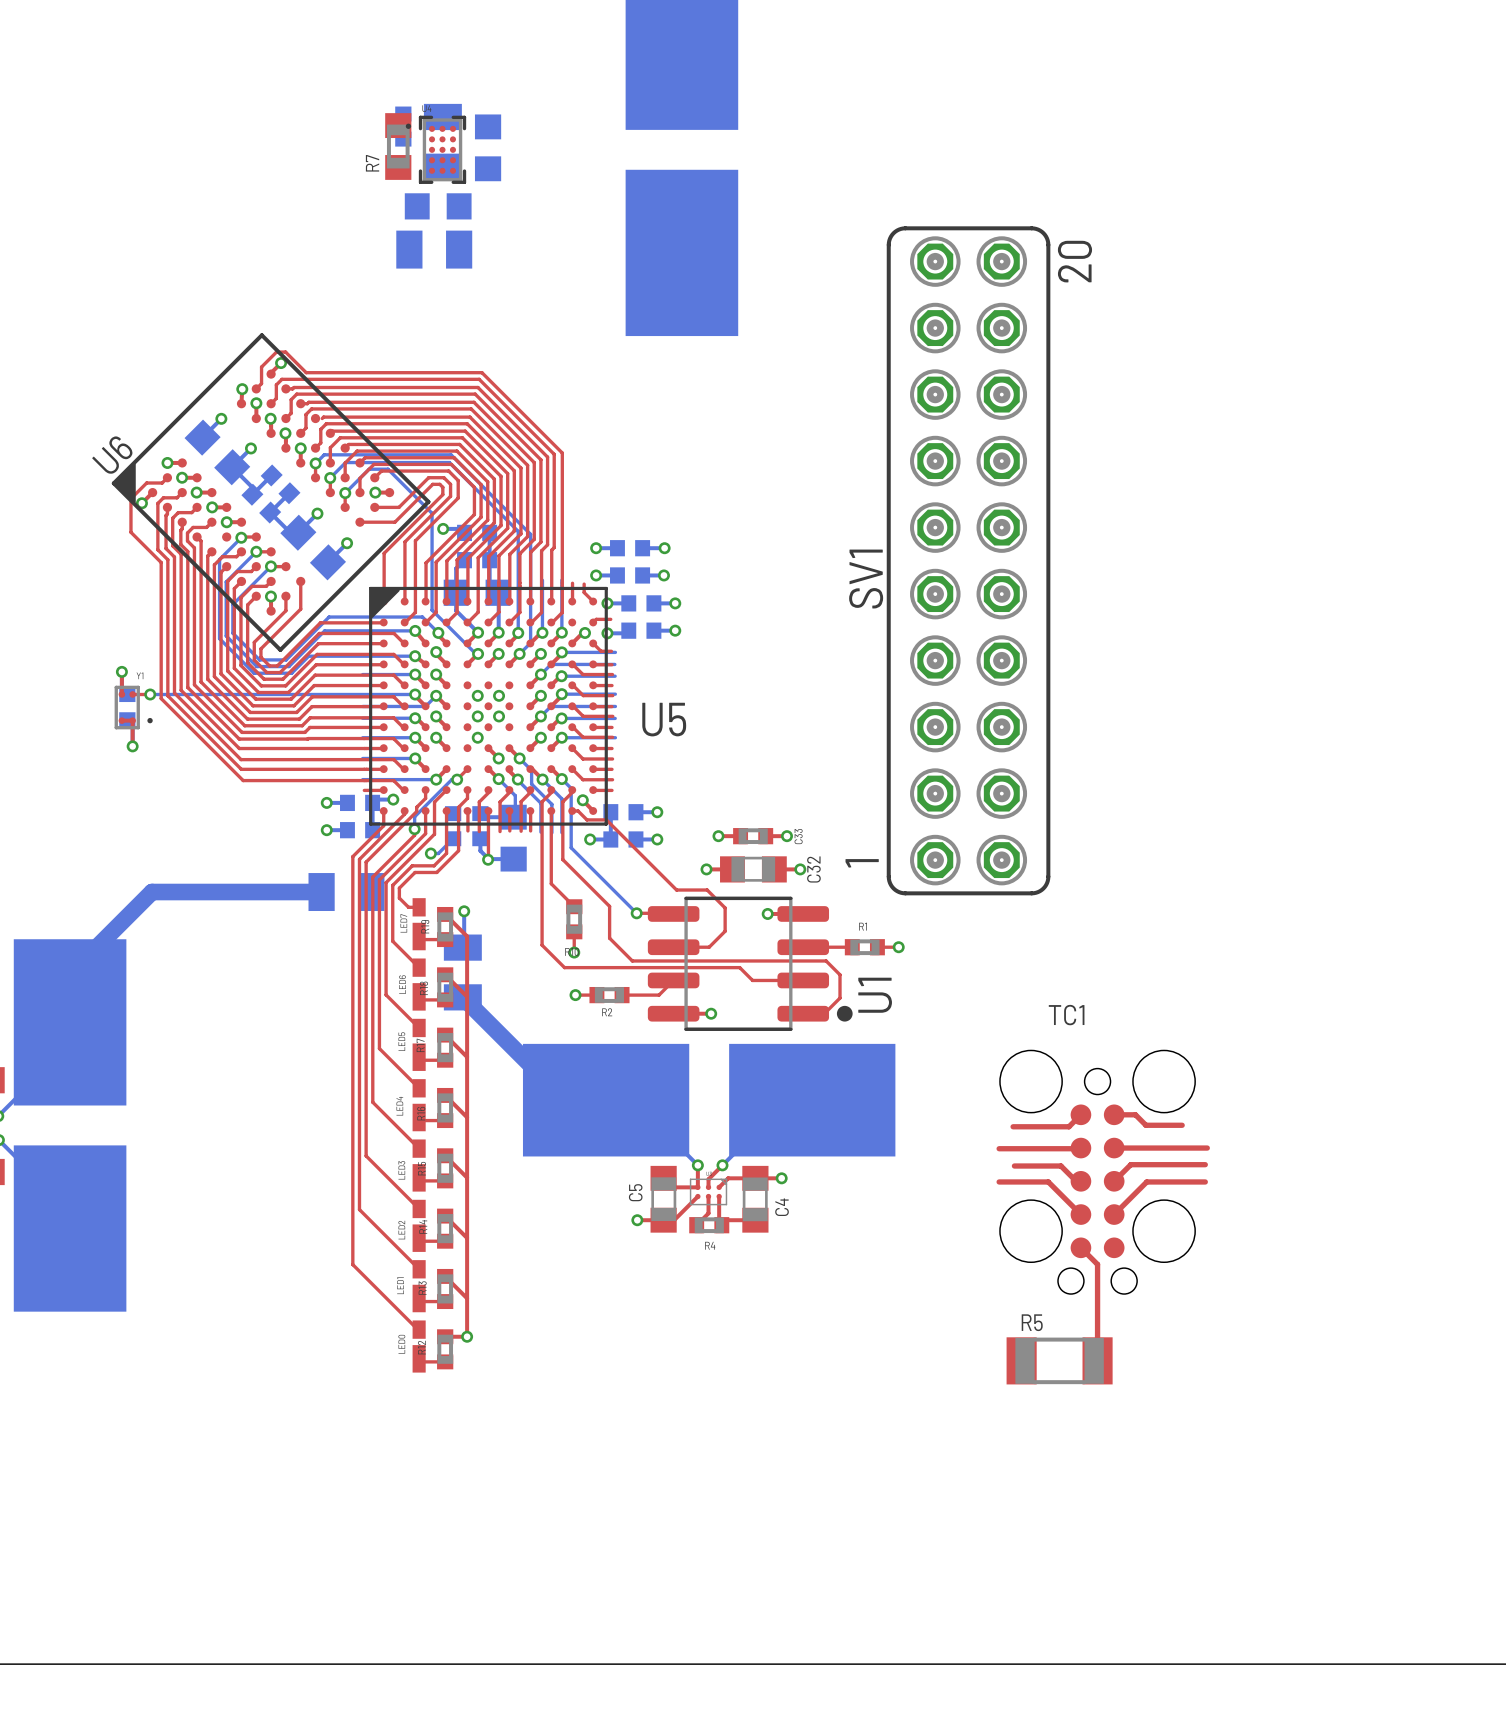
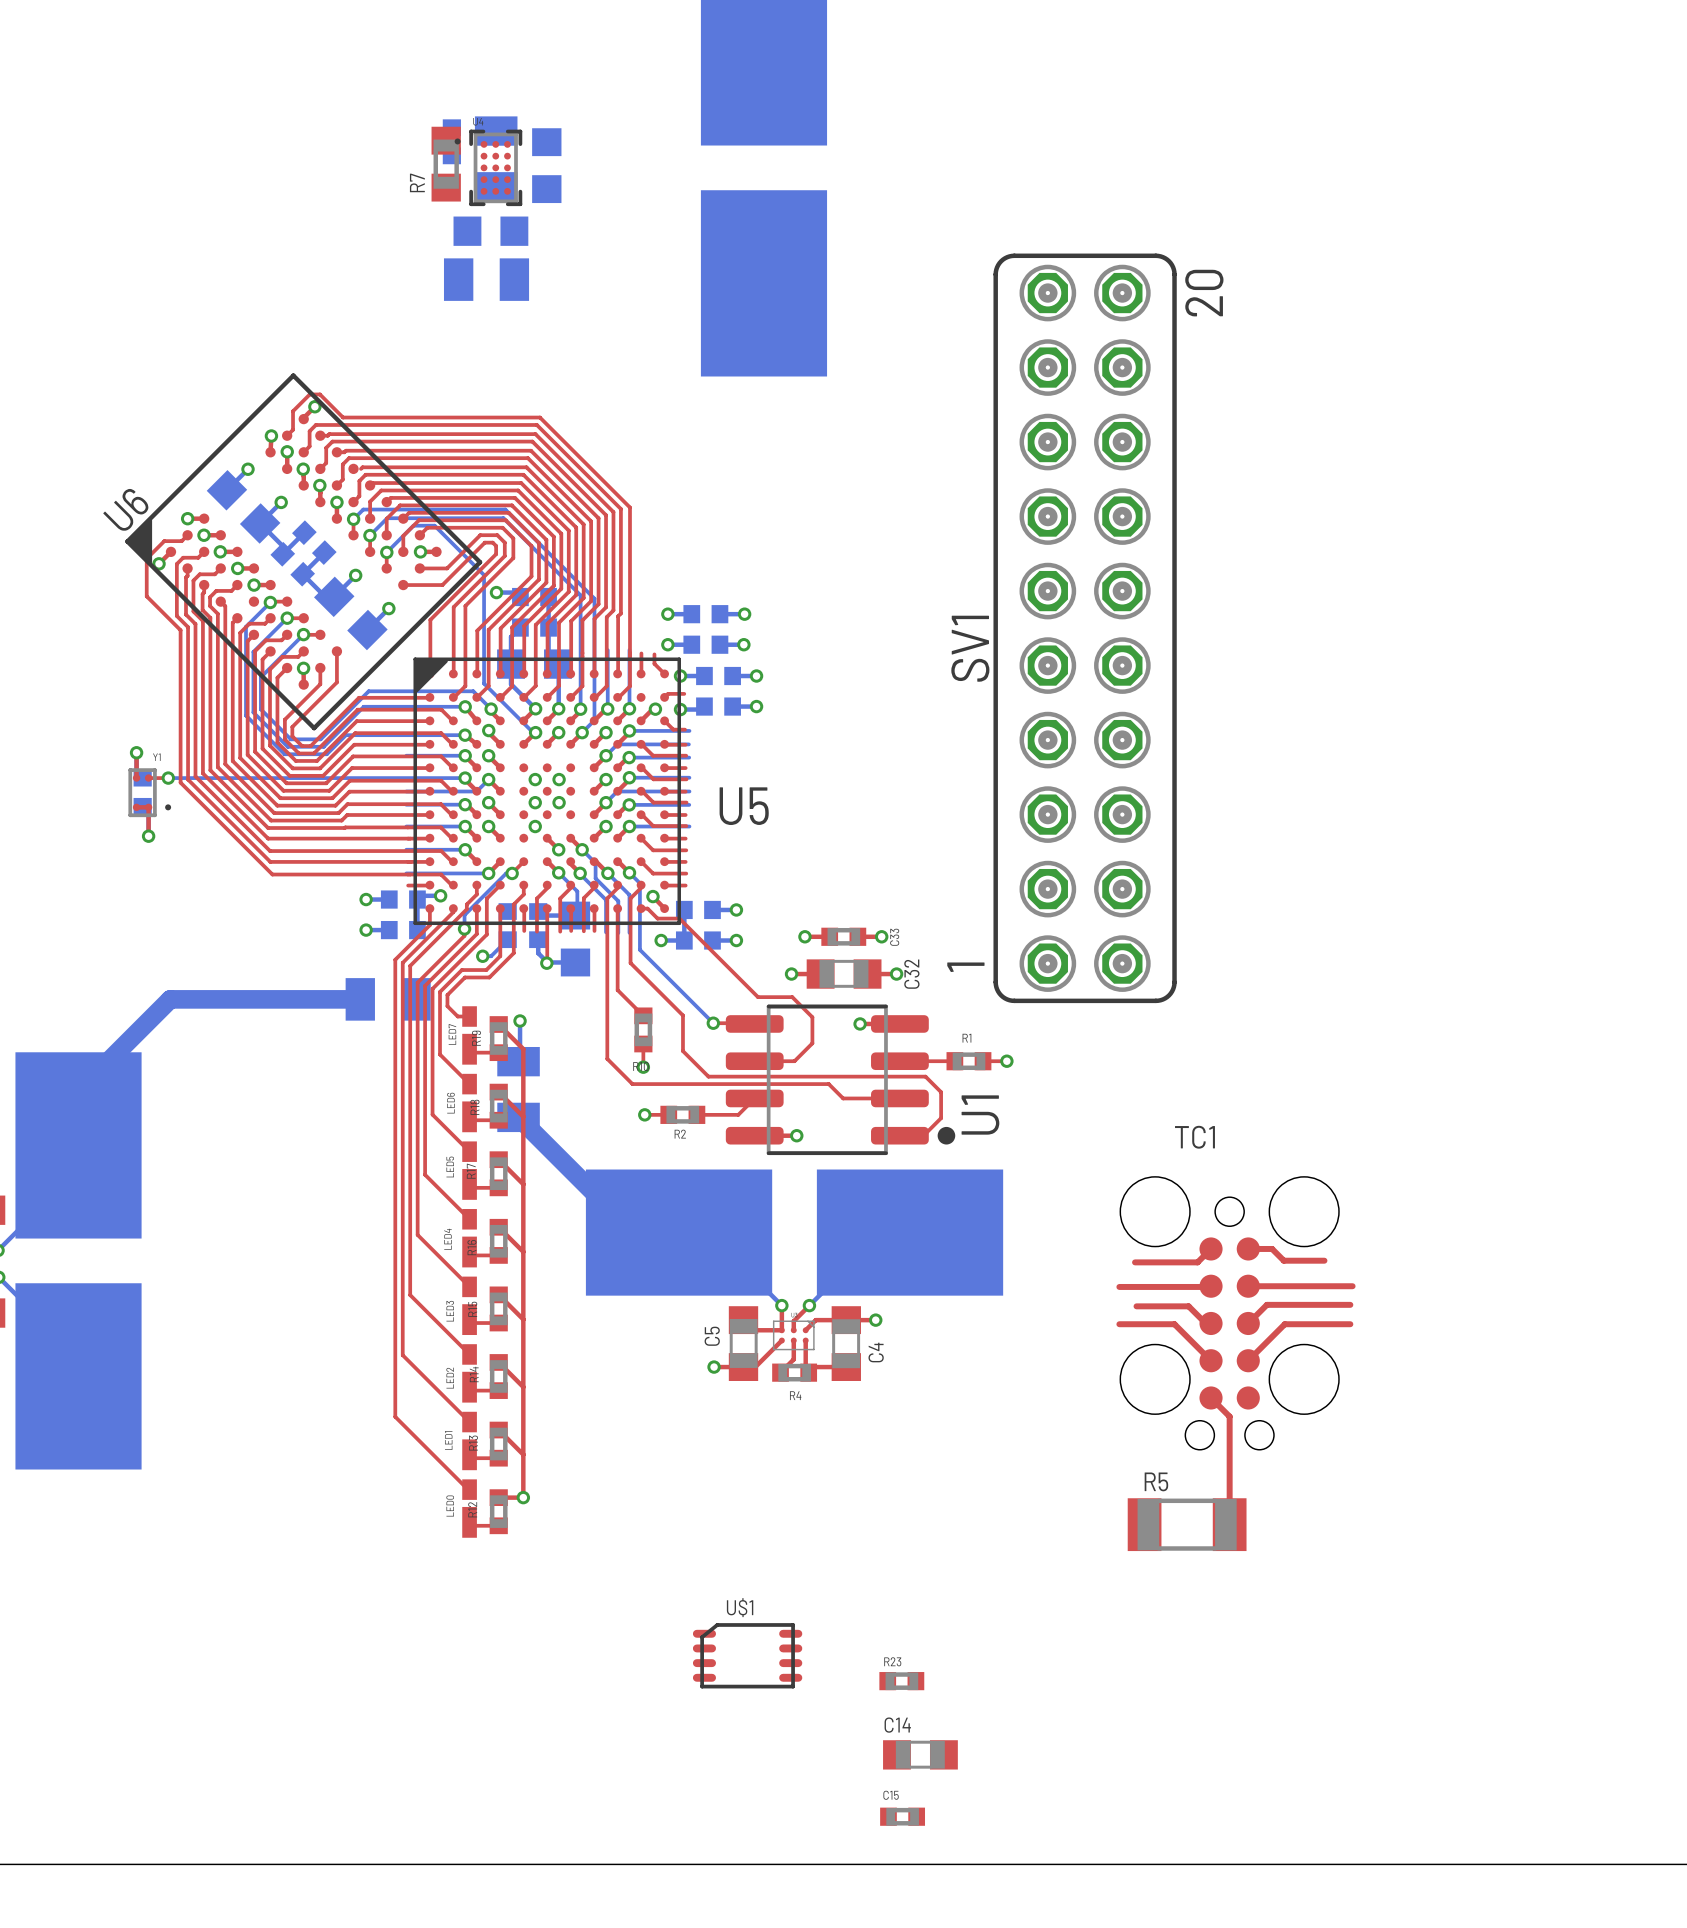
U$1: none -> (747, 1655)
R23: none -> (901, 1681)
C14: none -> (920, 1754)
C15: none -> (902, 1816)

